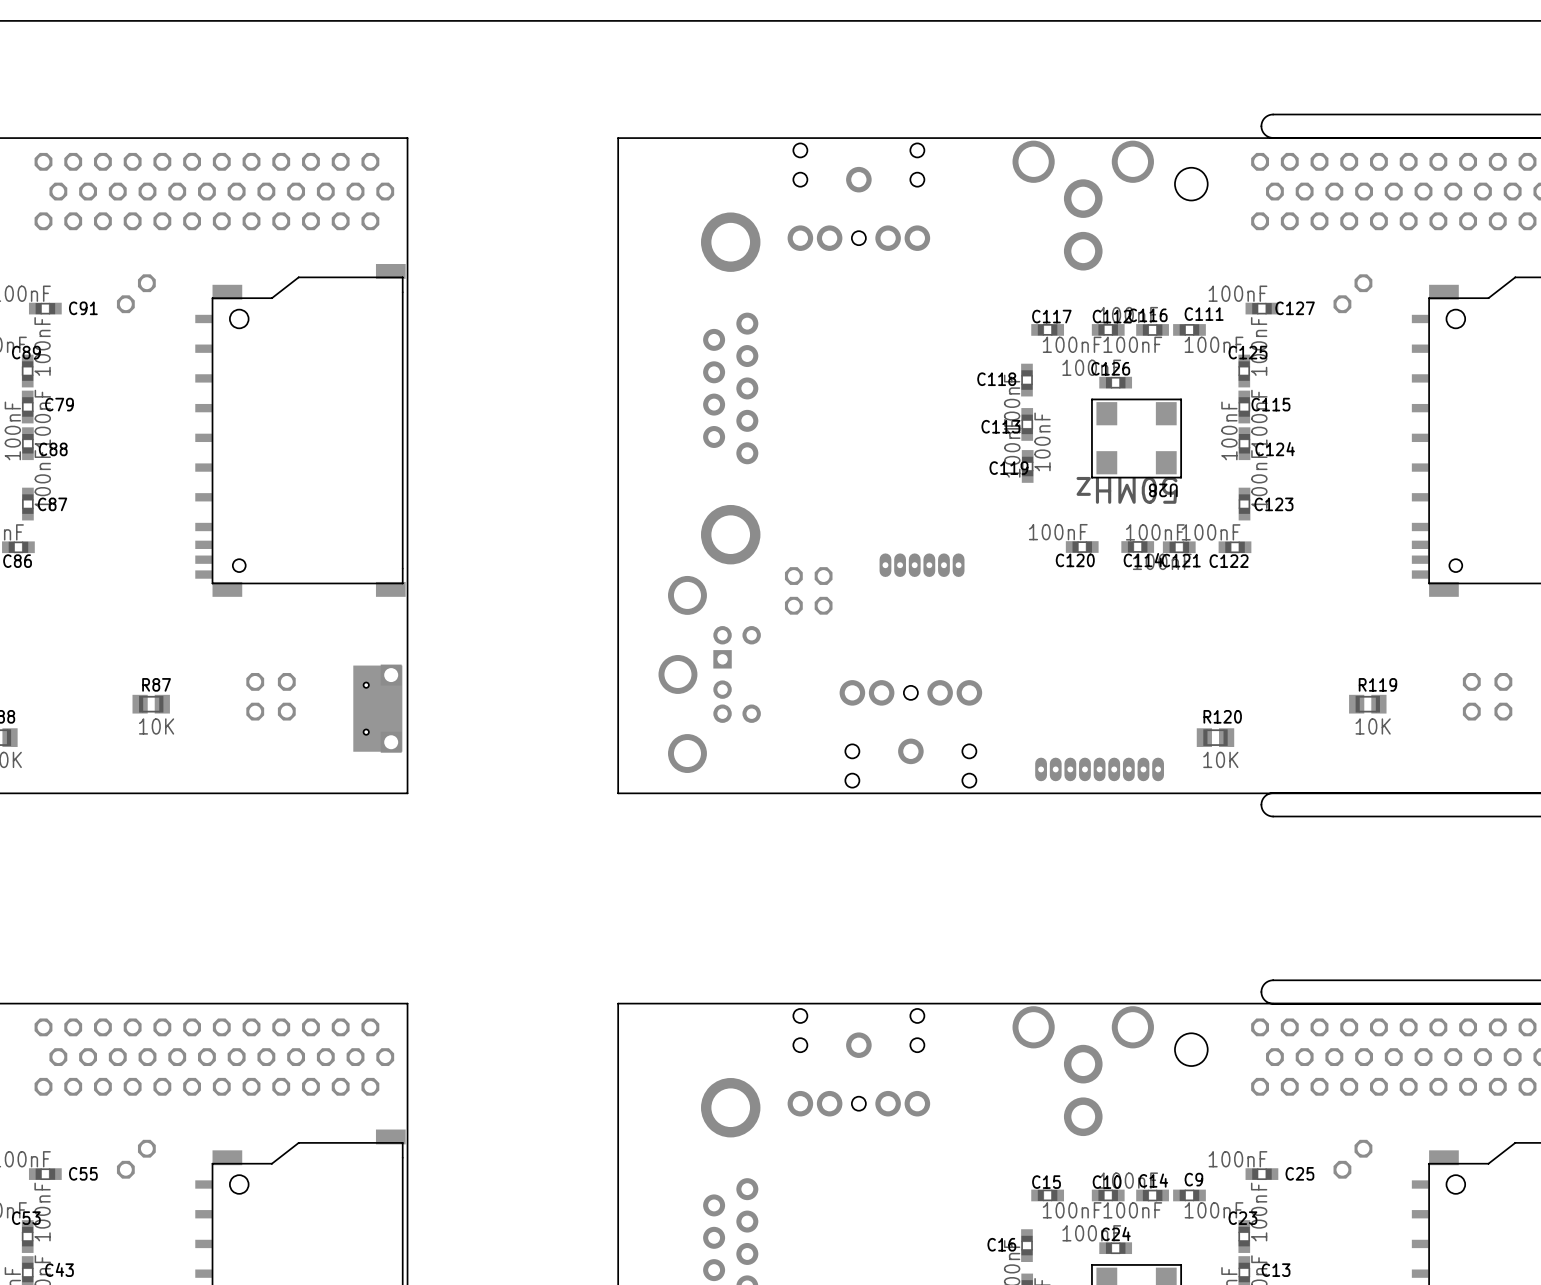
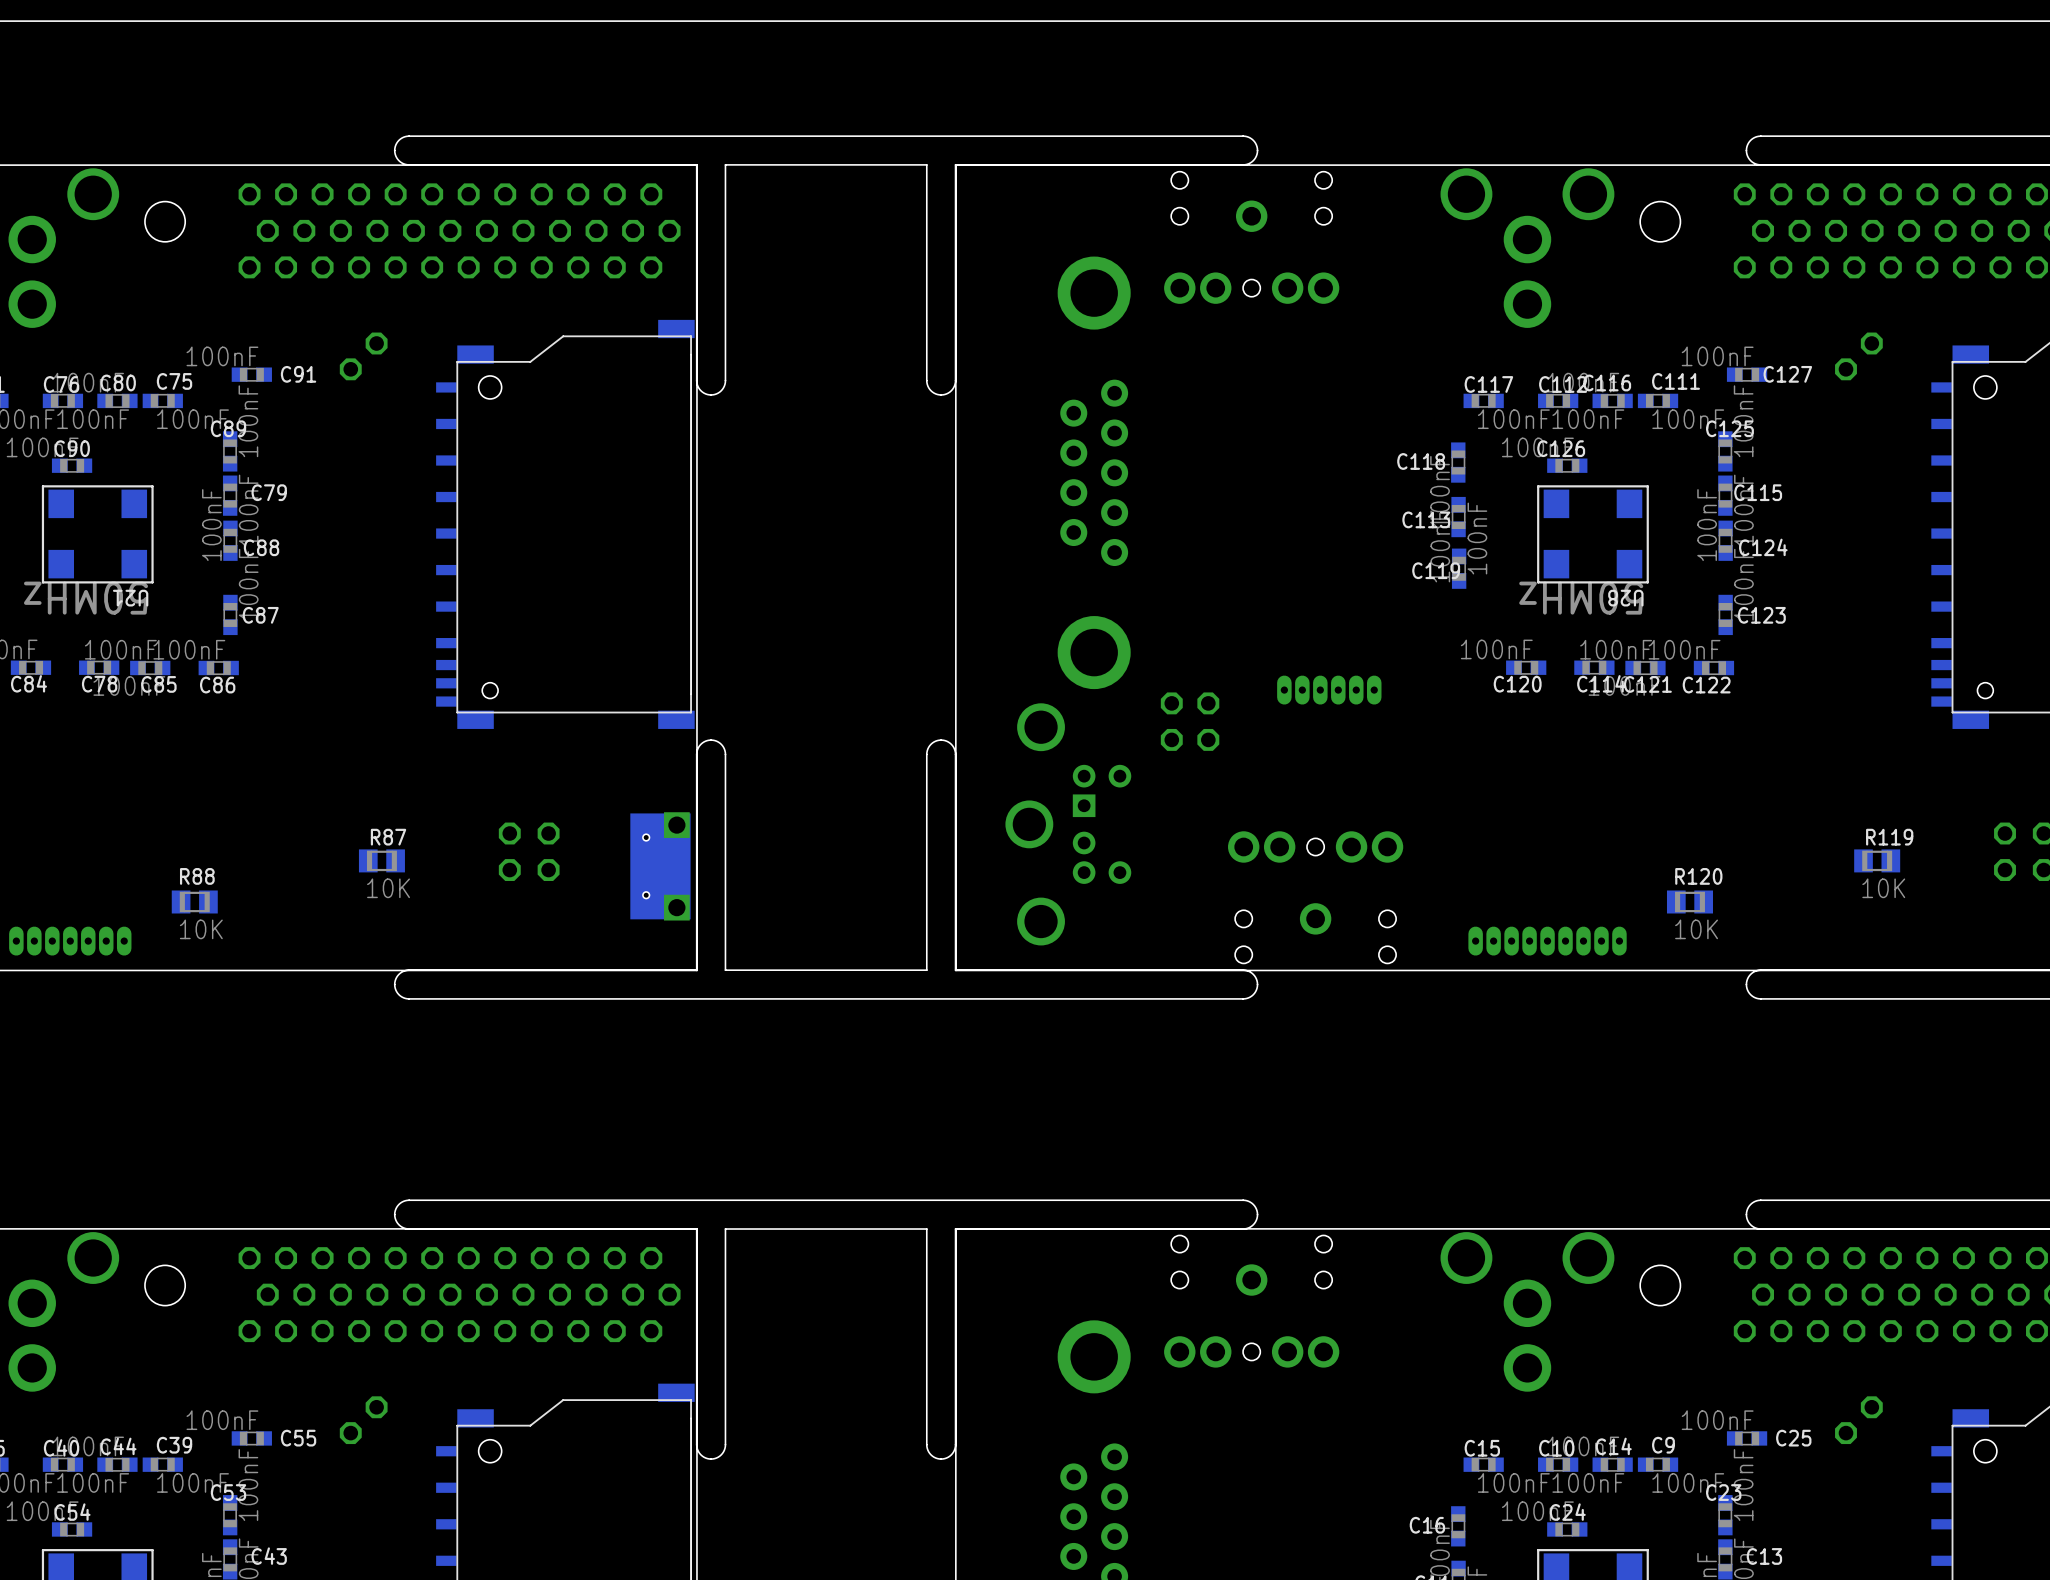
board edge: none -> (1243, 136) (409, 136) (398, 140) (394, 150) (398, 160) (409, 164) (696, 164) (696, 380) (700, 390) (711, 394) (721, 390) (725, 380) (725, 164) (926, 164) (926, 380) (930, 390) (941, 394) (951, 390) (955, 380) (955, 164) (1245, 164) (1254, 159) (1257, 150) (1253, 140) (1243, 136)
board edge: none -> (941, 740) (951, 744) (955, 754) (955, 970) (1245, 970) (1251, 973) (1256, 979) (1257, 986) (1254, 993) (1243, 998) (409, 998) (400, 995) (395, 990) (396, 977) (407, 970) (696, 970) (696, 754) (700, 744) (711, 740) (721, 744) (725, 754) (725, 970) (926, 970) (926, 754) (930, 744) (941, 740)
board edge: none -> (1243, 1200) (409, 1200) (398, 1204) (394, 1214) (398, 1224) (409, 1229) (696, 1229) (696, 1444) (700, 1454) (711, 1459) (721, 1454) (725, 1444) (725, 1229) (926, 1229) (926, 1444) (930, 1454) (941, 1459) (951, 1454) (955, 1444) (955, 1229) (1245, 1228) (1254, 1223) (1257, 1214) (1253, 1204) (1243, 1200)

